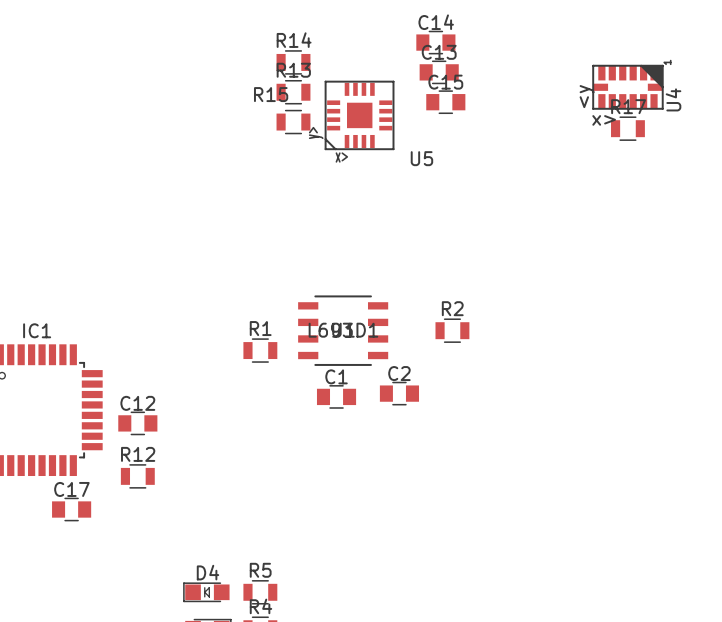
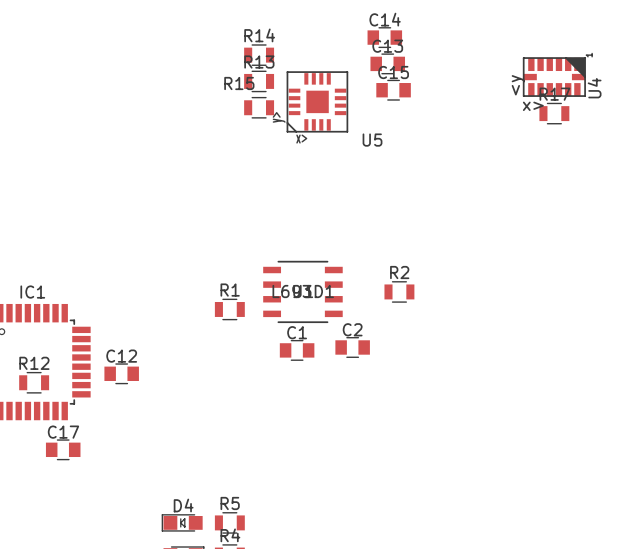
R12 position: (137, 476) -> (34, 382)

